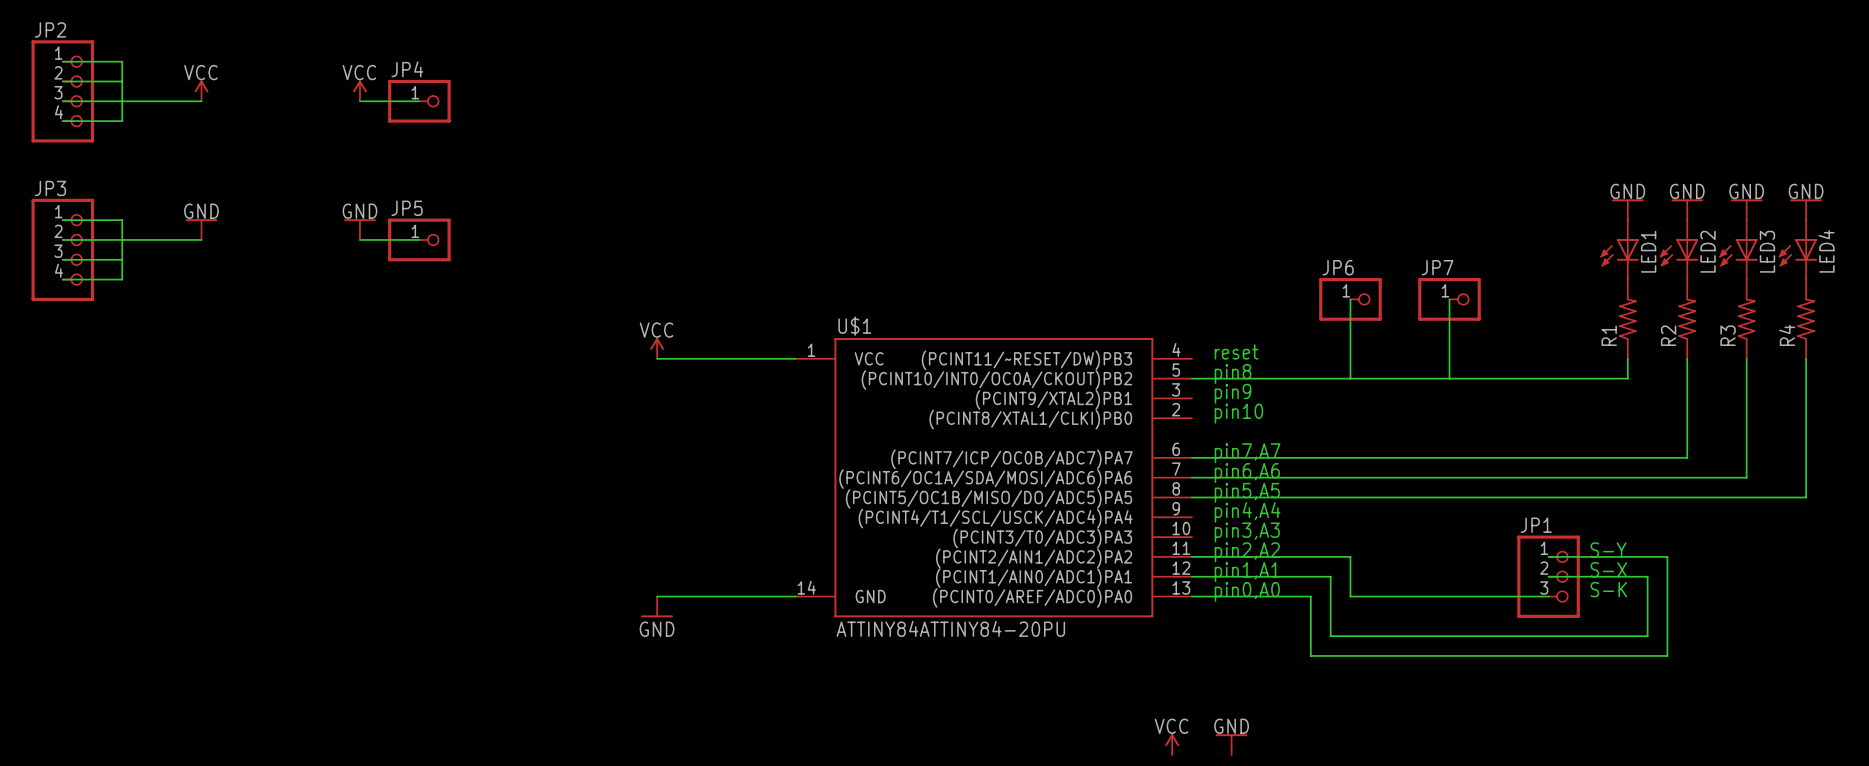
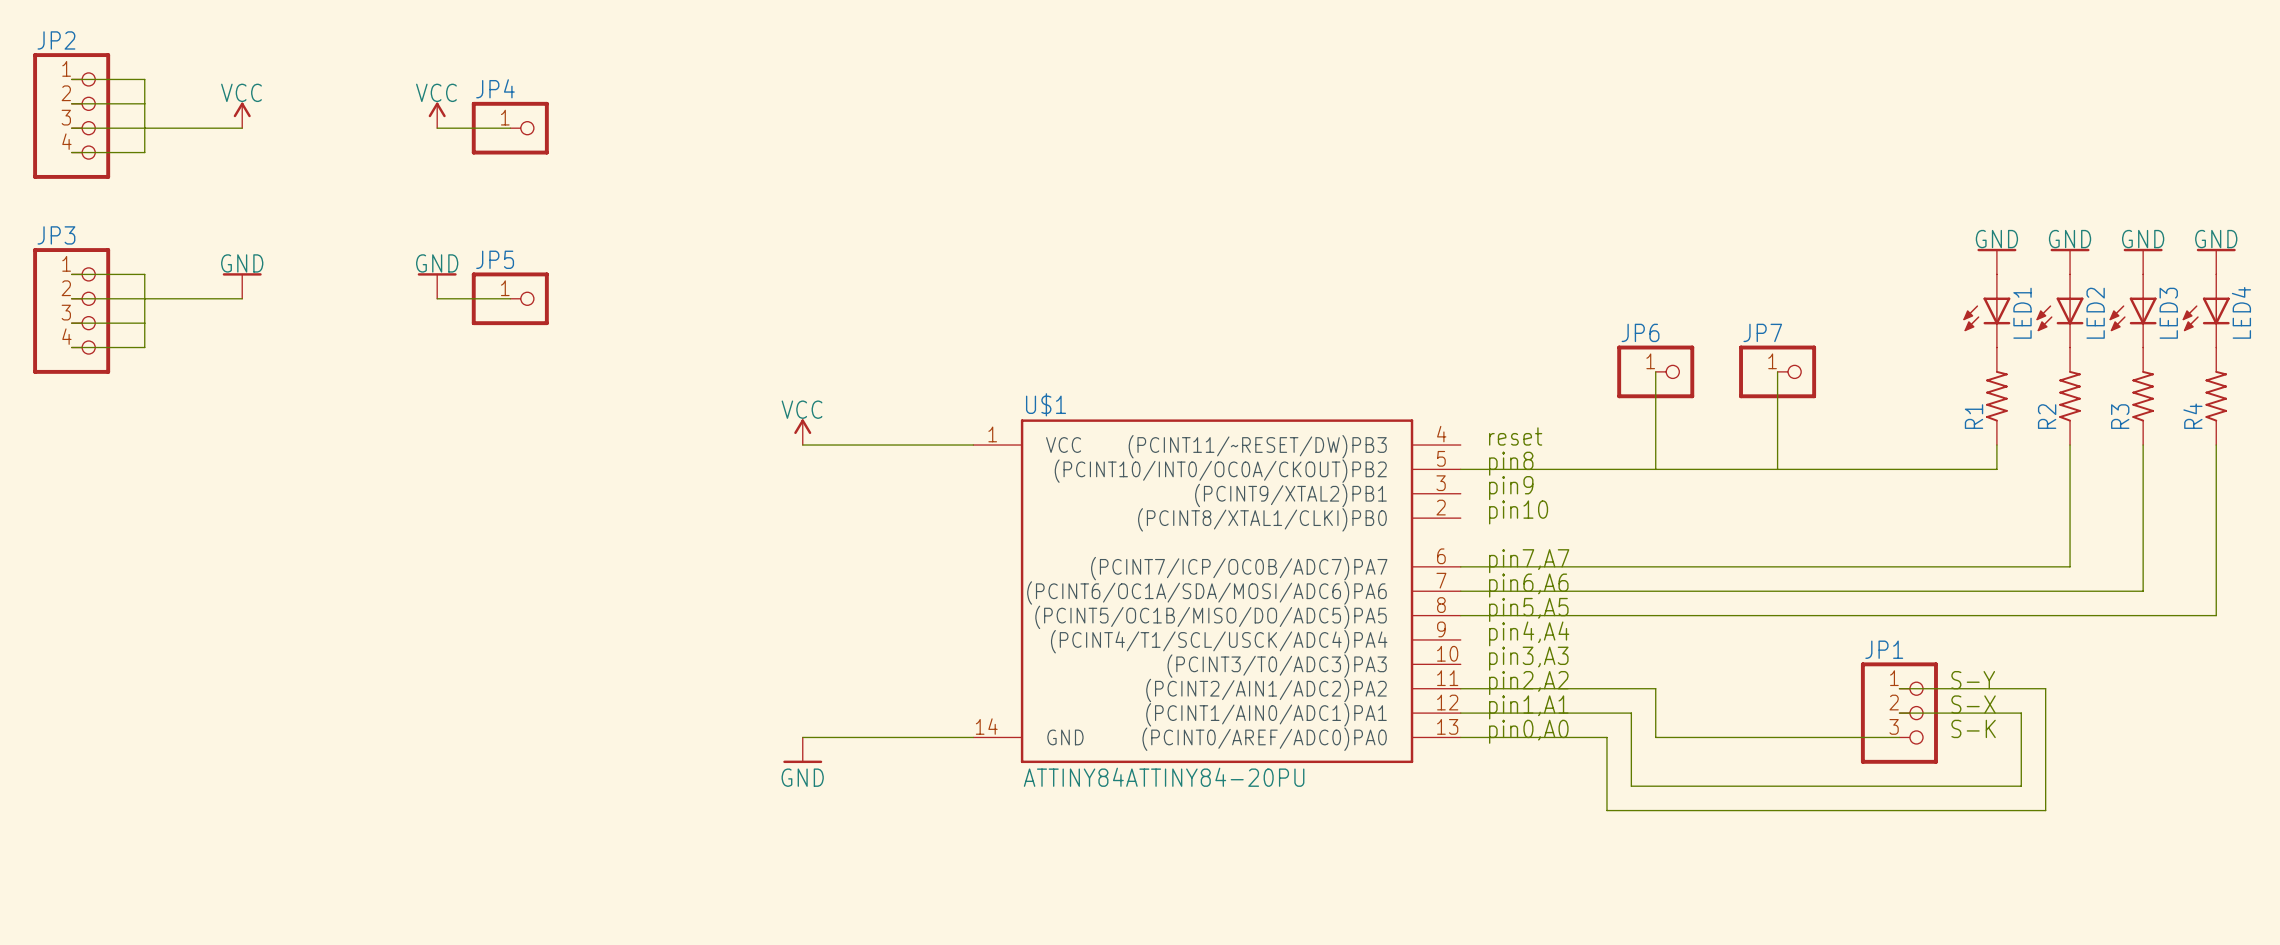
power symbol: VCC (1172, 744) -> none
power symbol: GND (1231, 744) -> none

